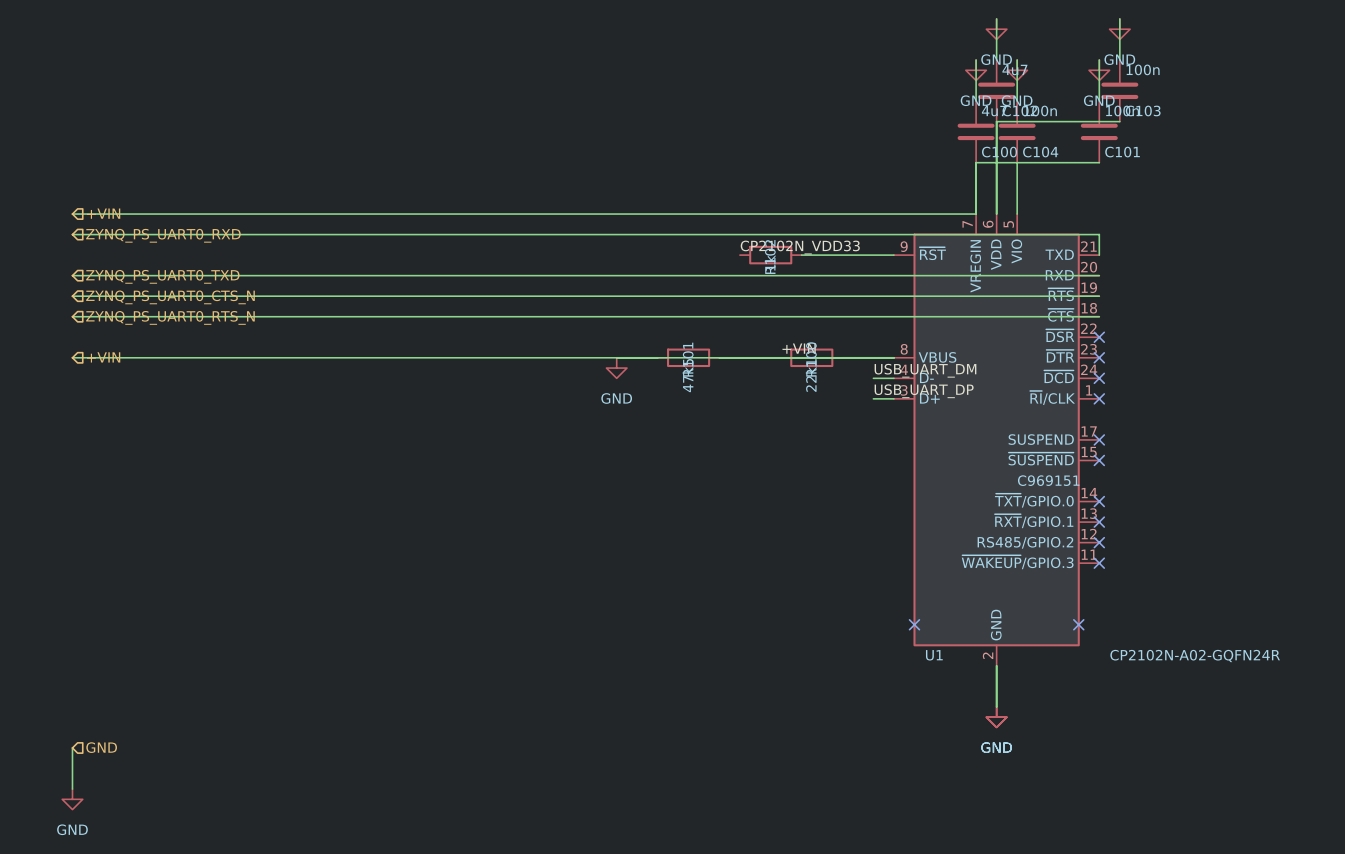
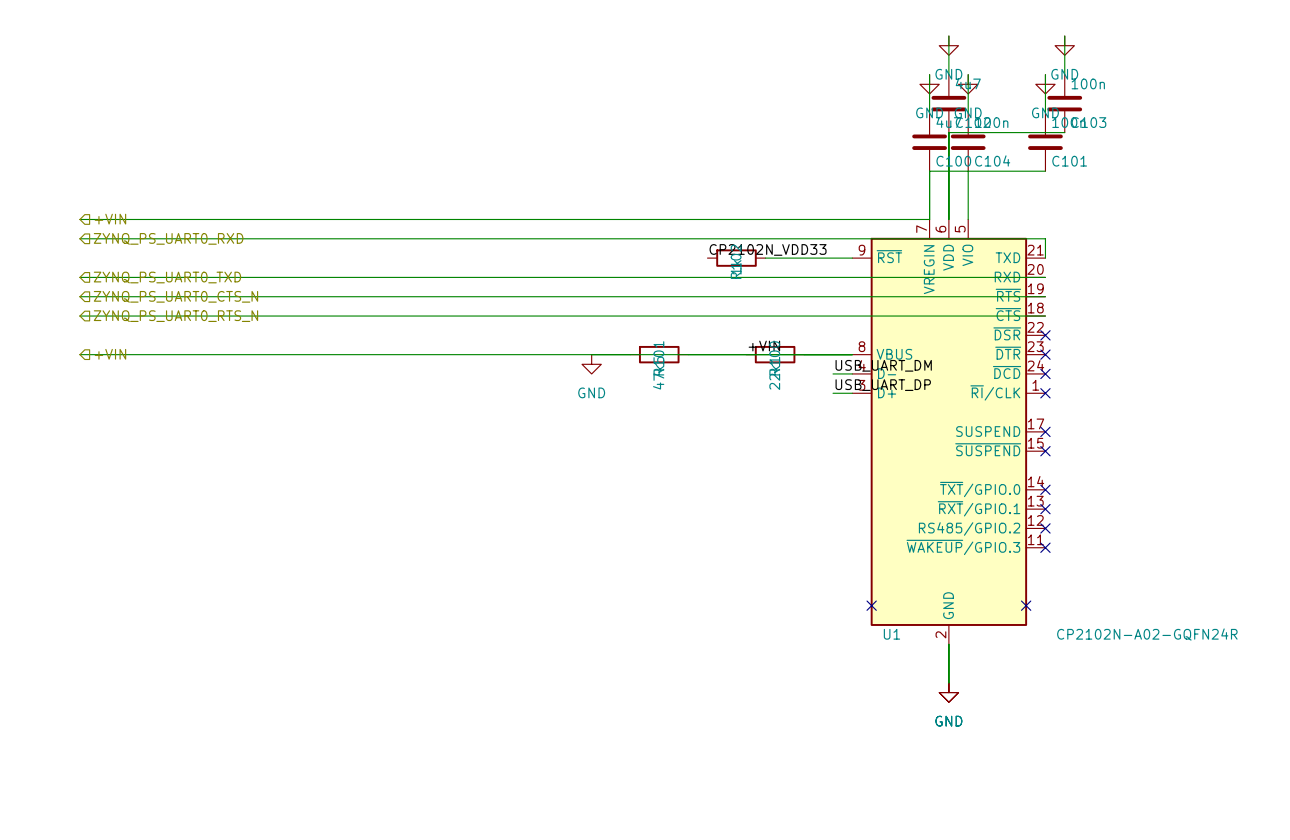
U1 text: C969151 (1048, 480) -> none
wire: (72, 747) (72, 789) -> none
hierarchical label: GND (101, 747) -> none
power symbol: GND (72, 799) -> none

